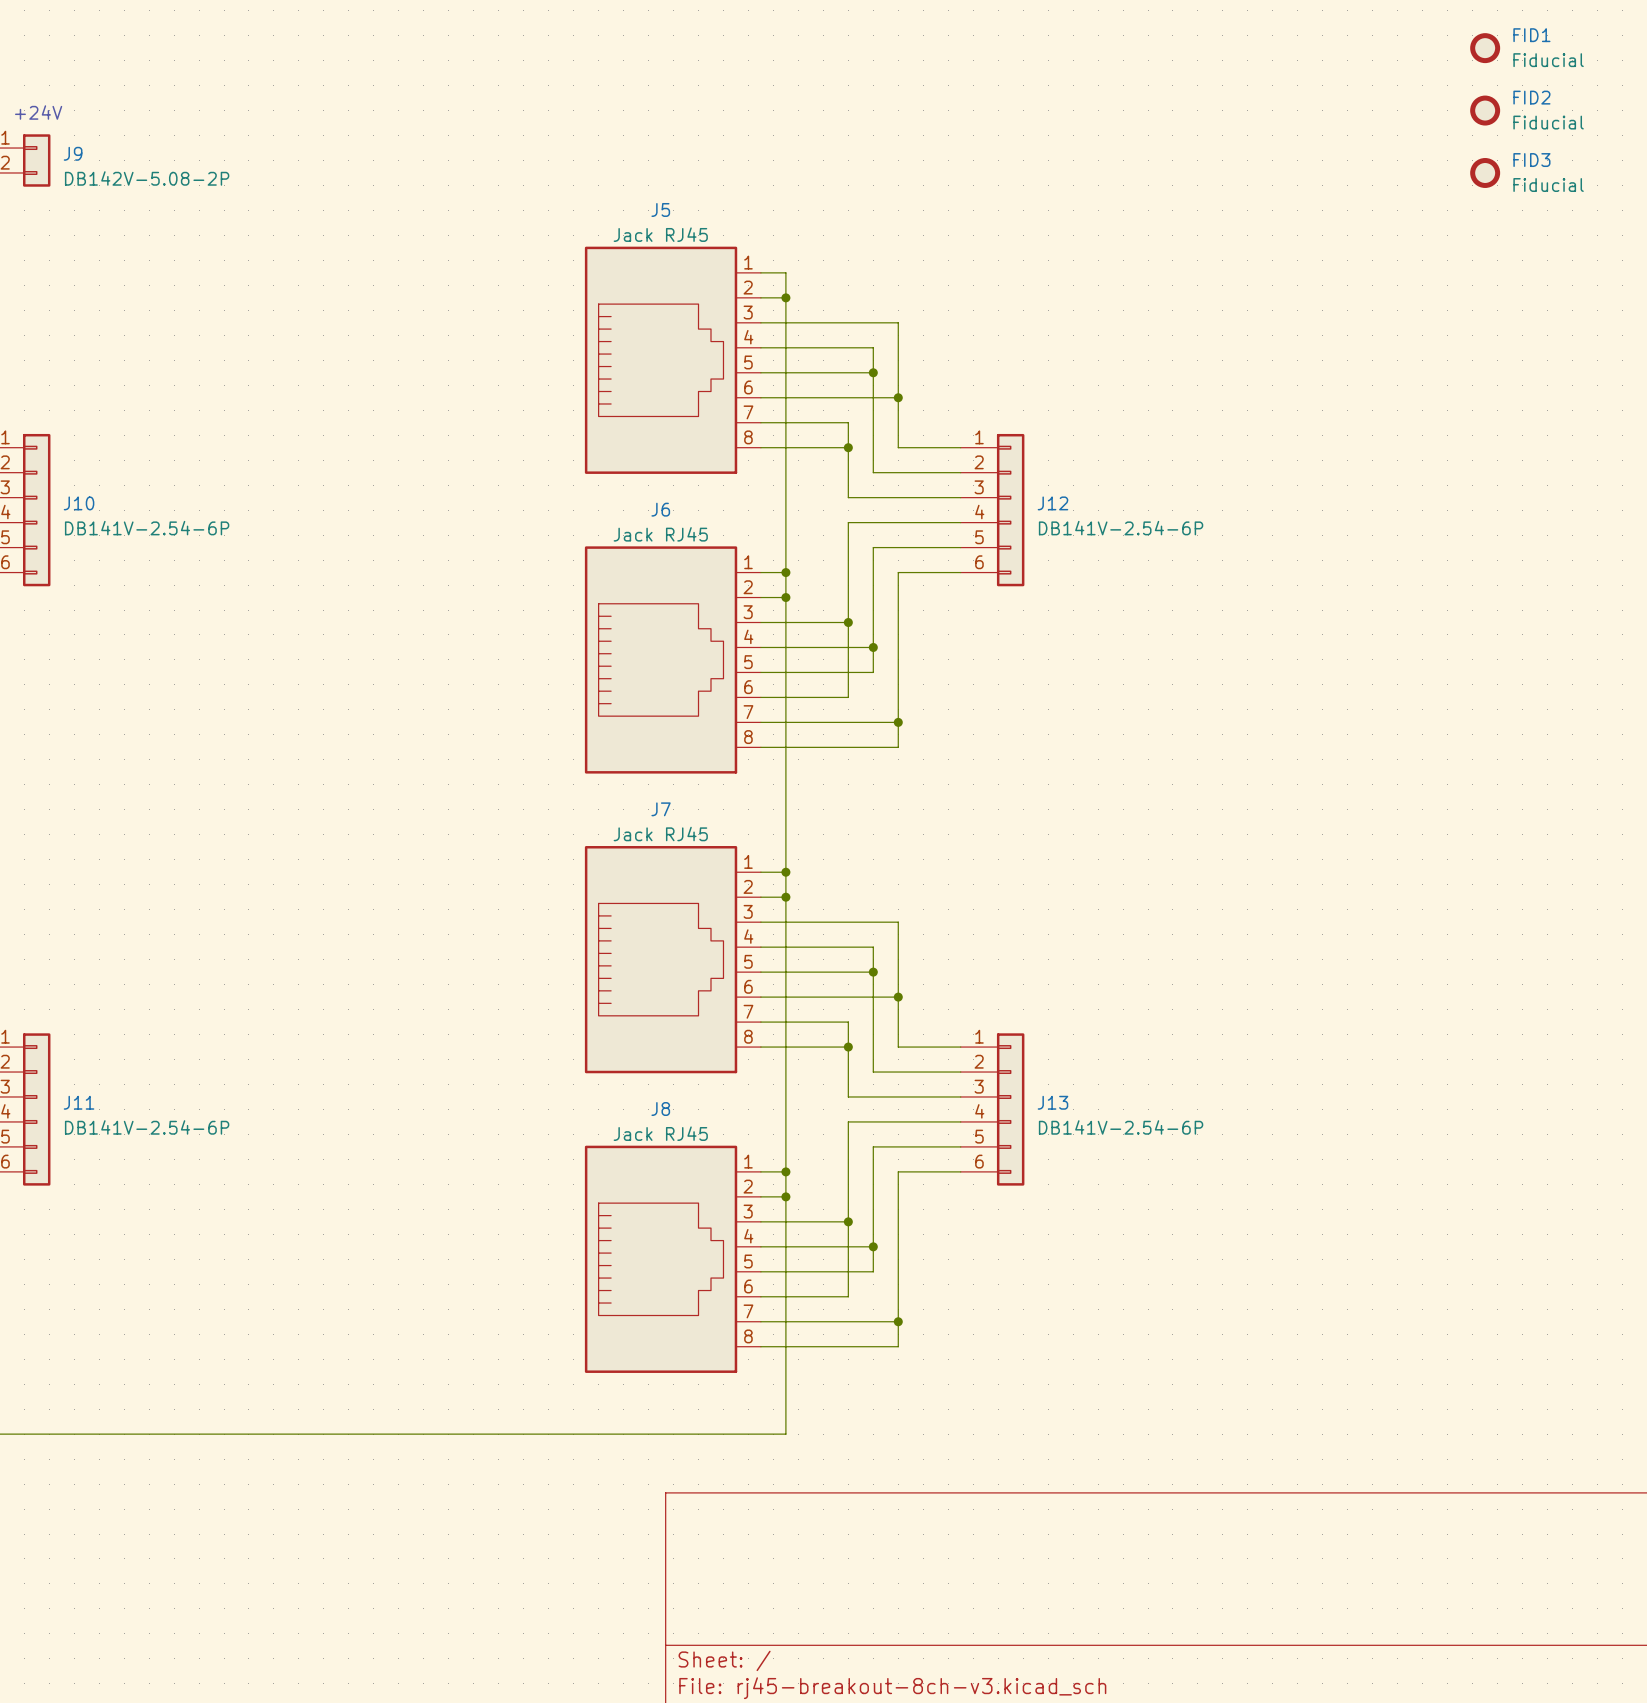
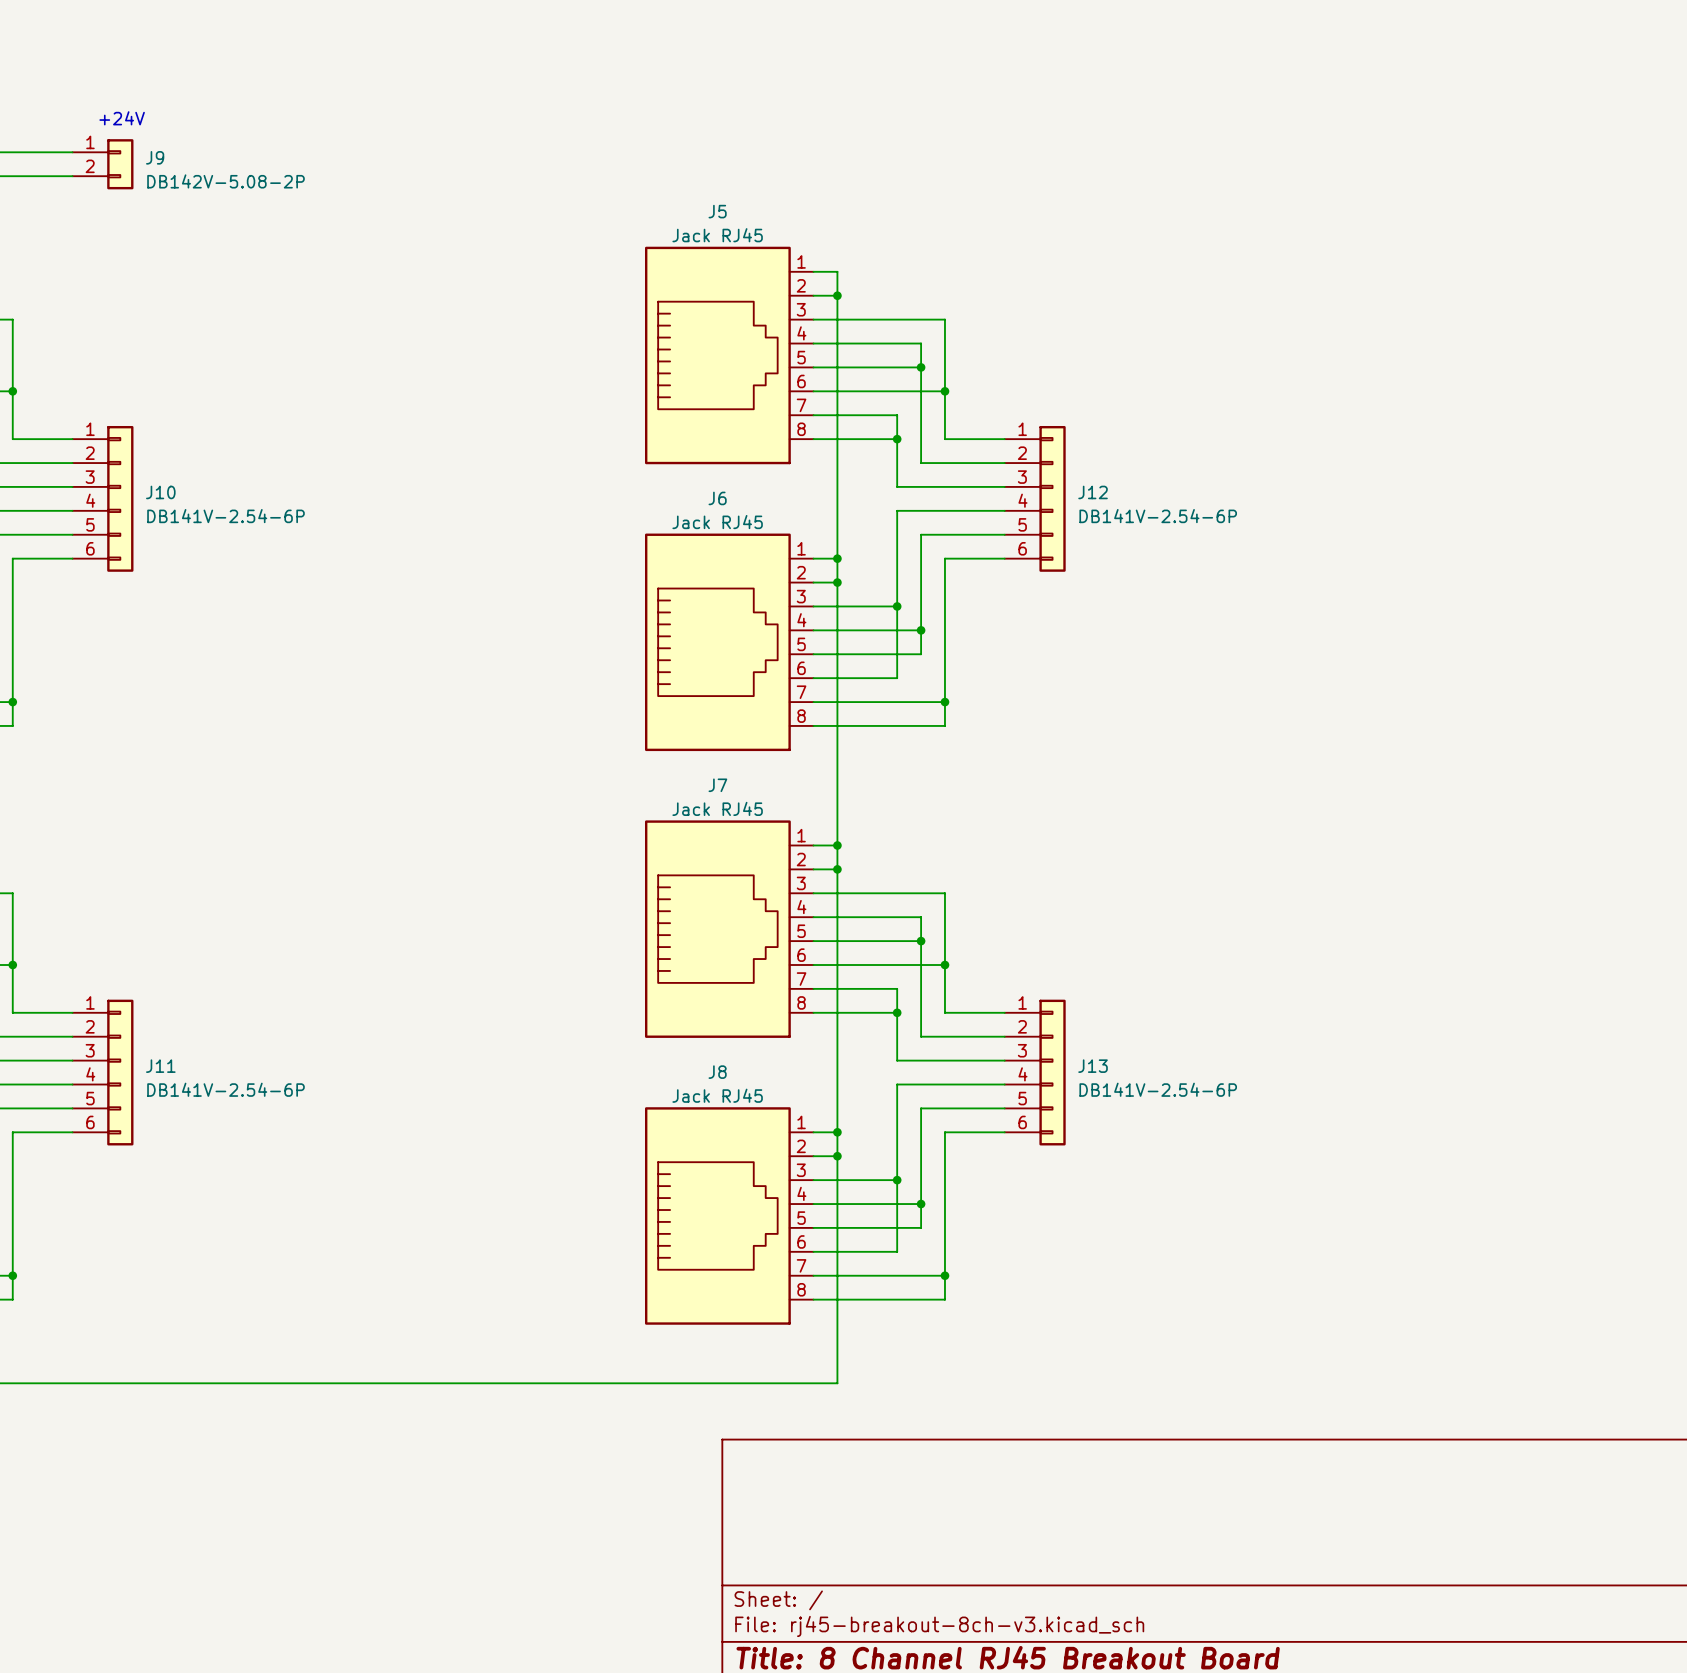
FID1: Fiducial (1485, 48) -> none
FID2: Fiducial (1485, 110) -> none
FID3: Fiducial (1485, 172) -> none

